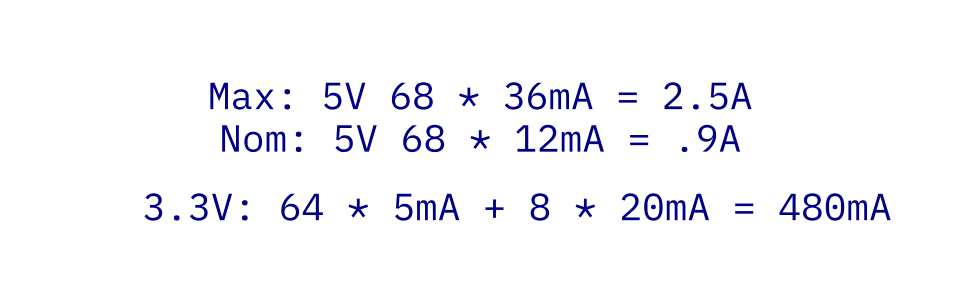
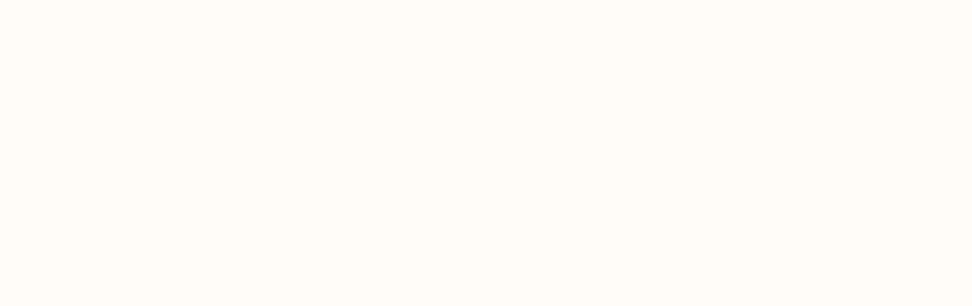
text: Max: 5V 68 * 36mA = 2.5A (480, 95) -> none
text: Nom: 5V 68 * 12mA = .9A (481, 138) -> none
text: 3.3V: 64 * 5mA + 8 * 20mA = 480mA (517, 206) -> none

